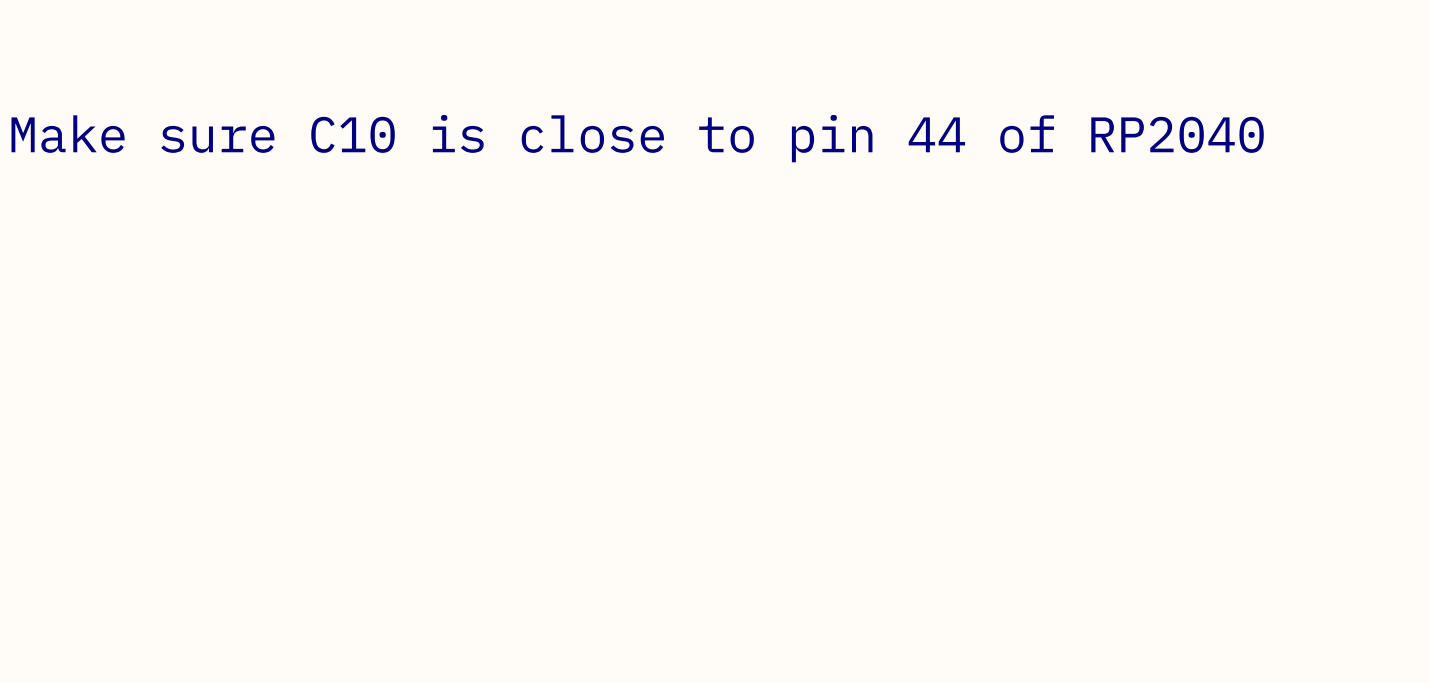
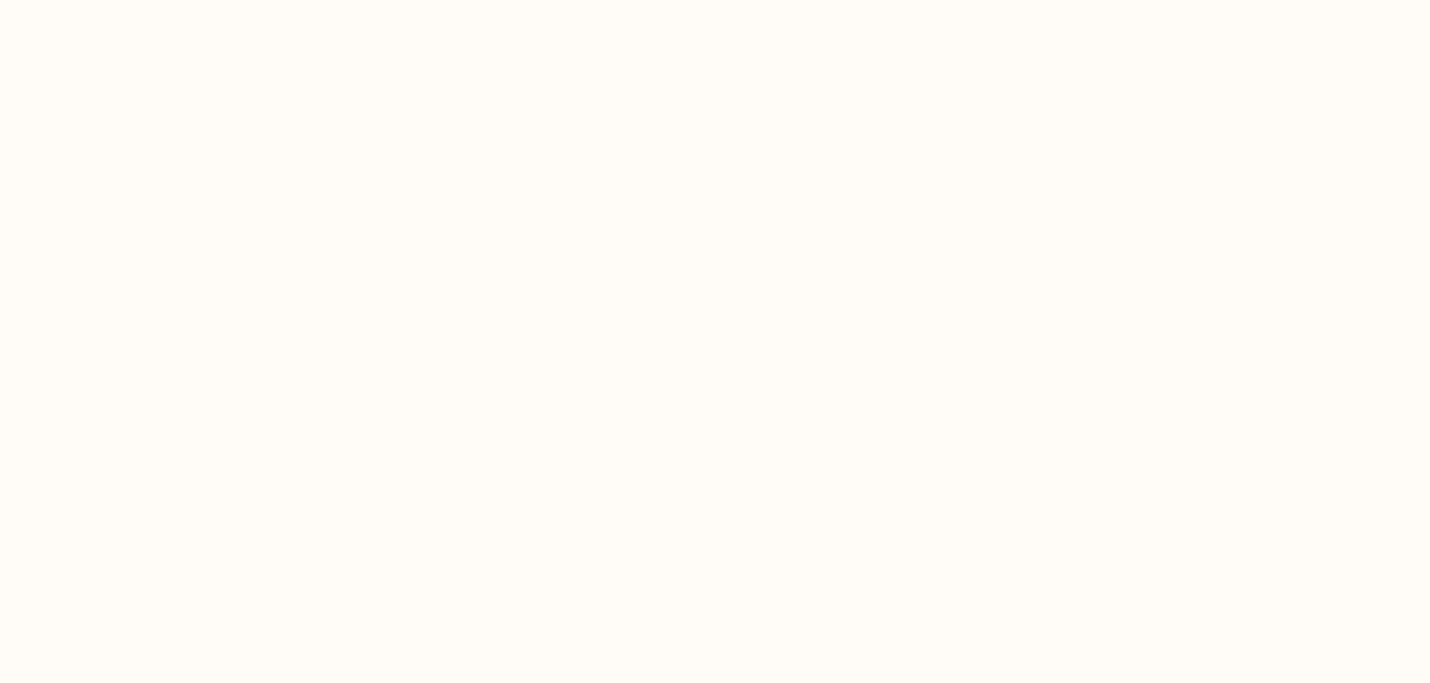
text: Make sure C10 is close to pin 44 of RP2040 (637, 138) -> none

